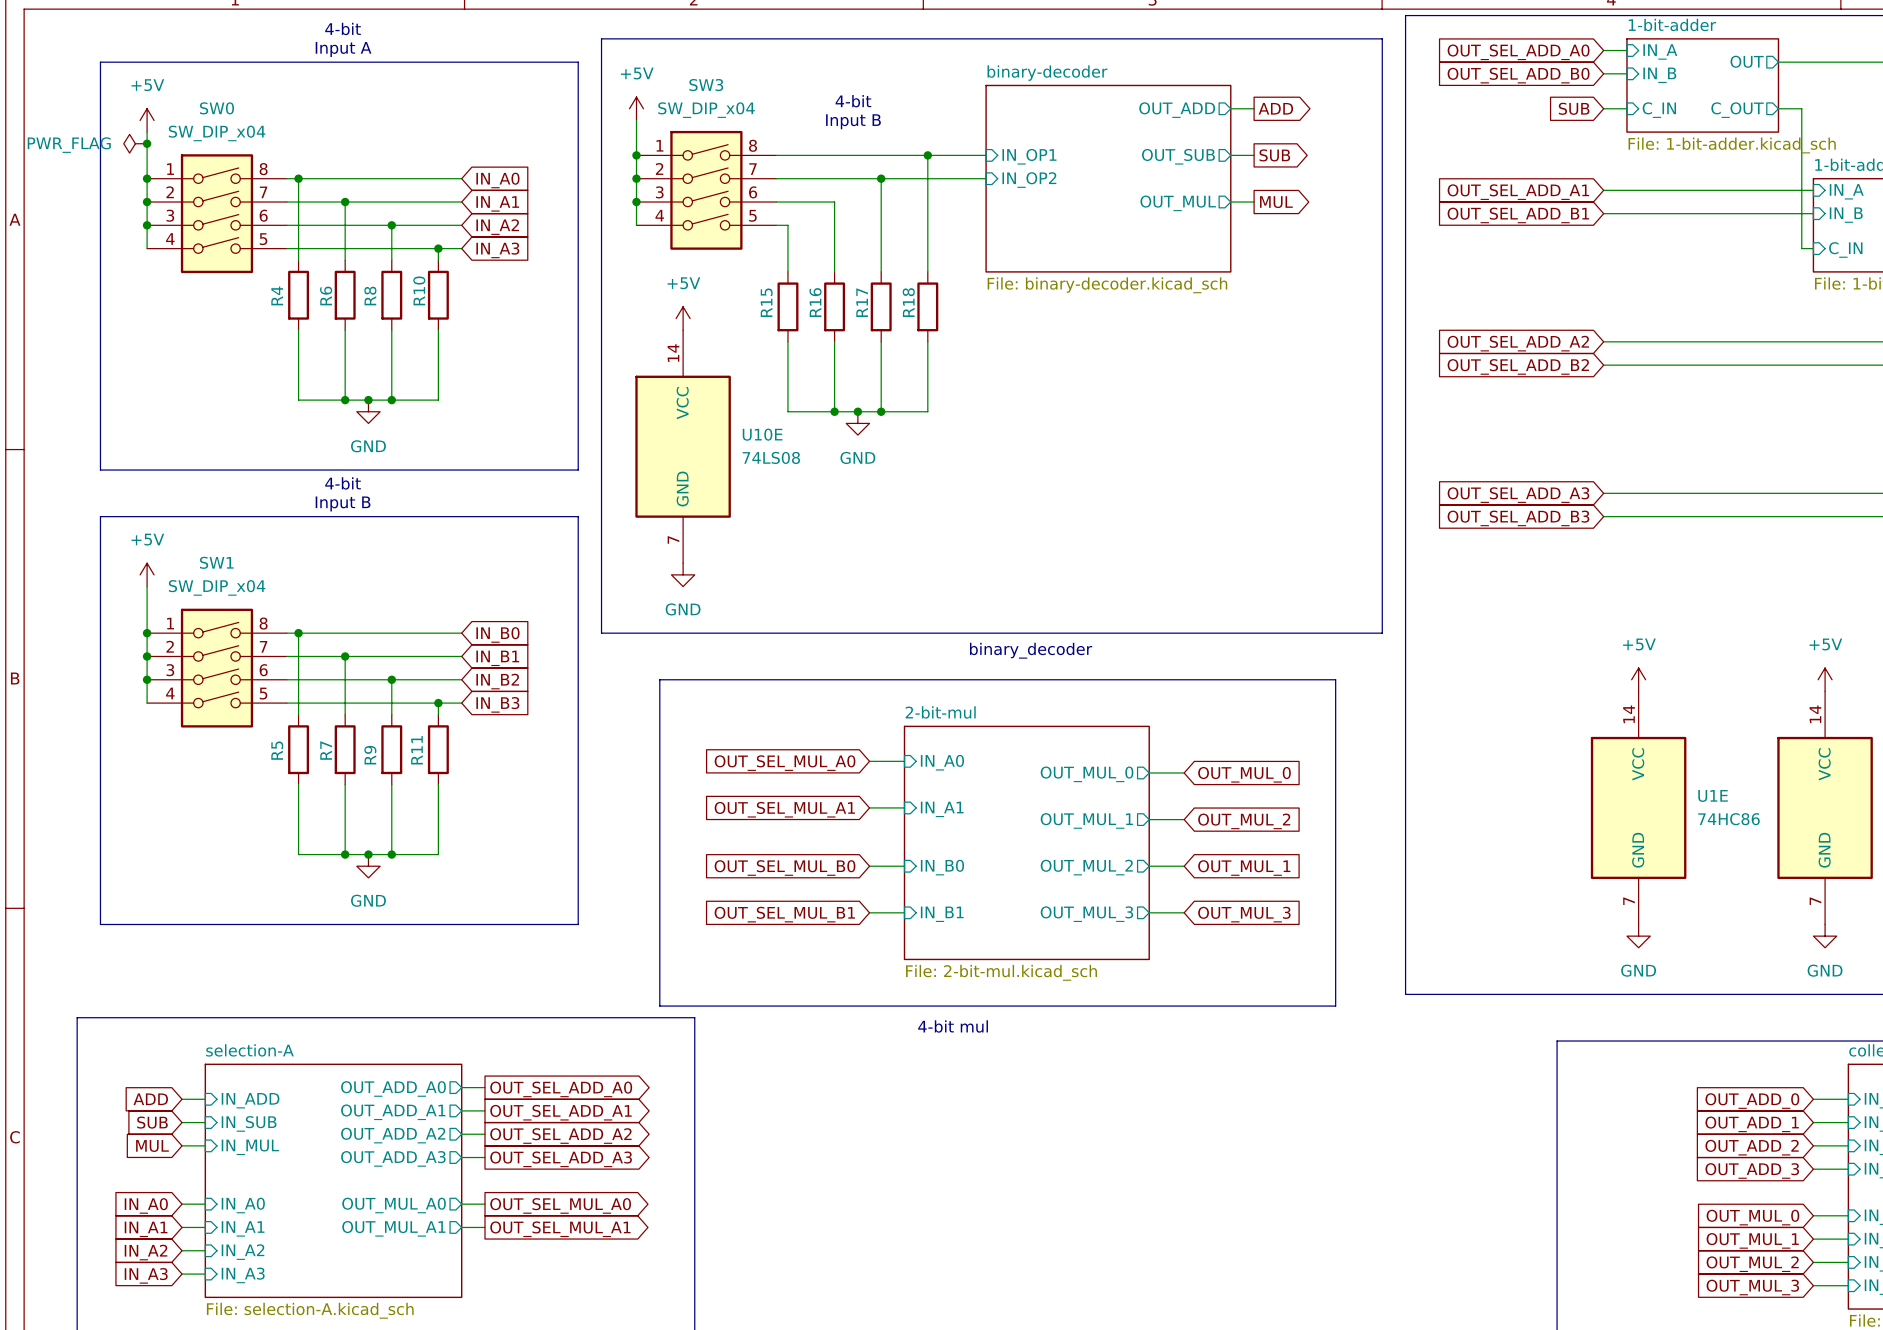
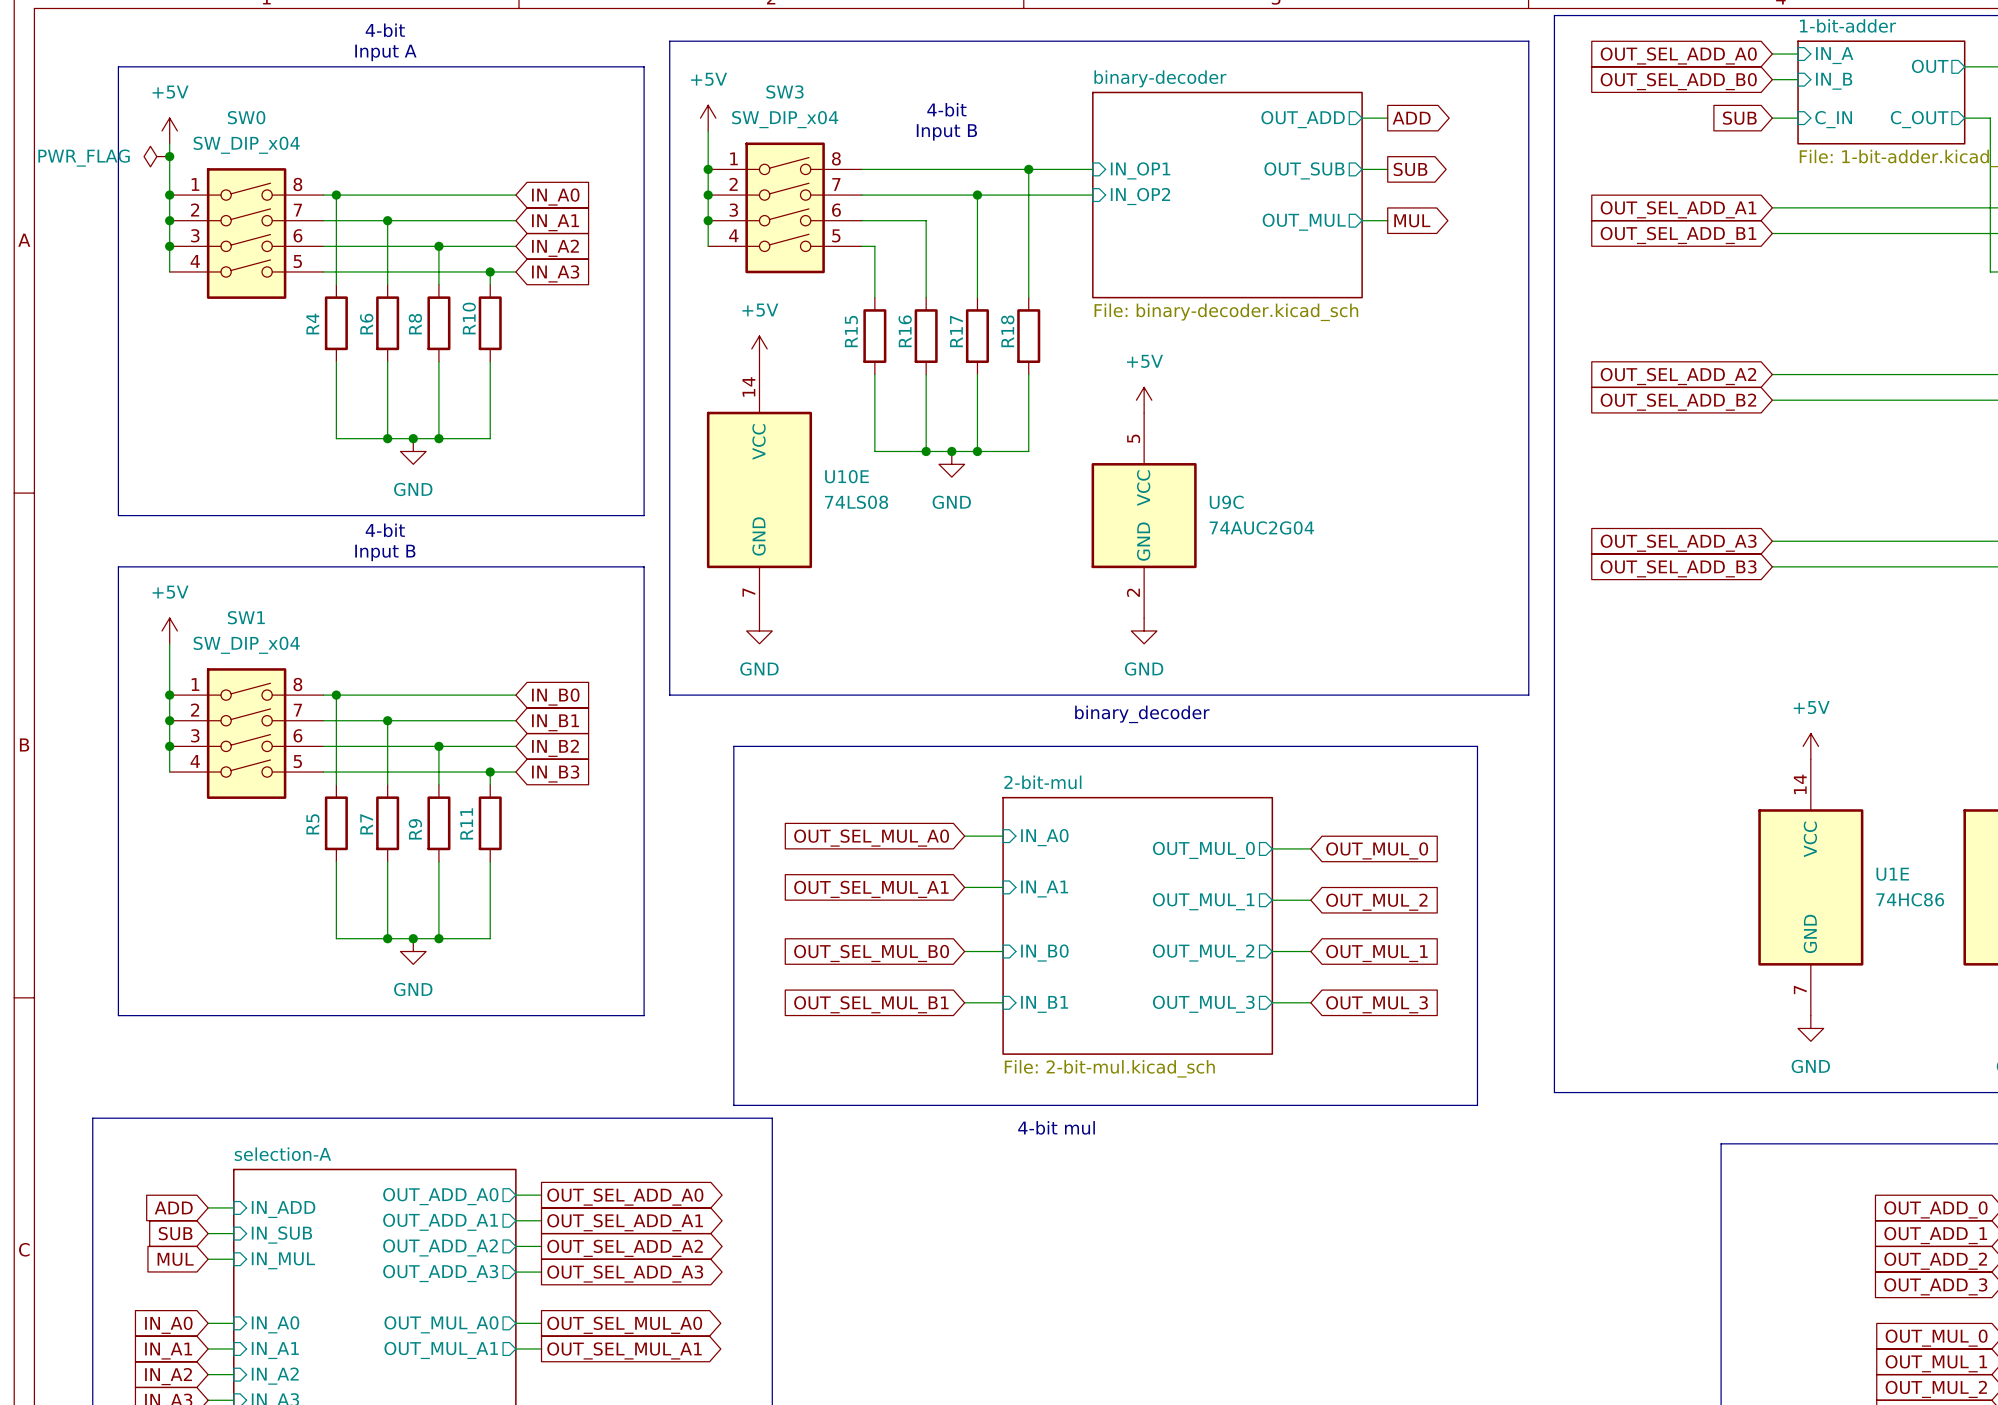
power symbol: none -> +5V (1144, 400)
U9C: none -> 74AUC2G04 (1144, 515)
power symbol: none -> GND (1144, 630)

